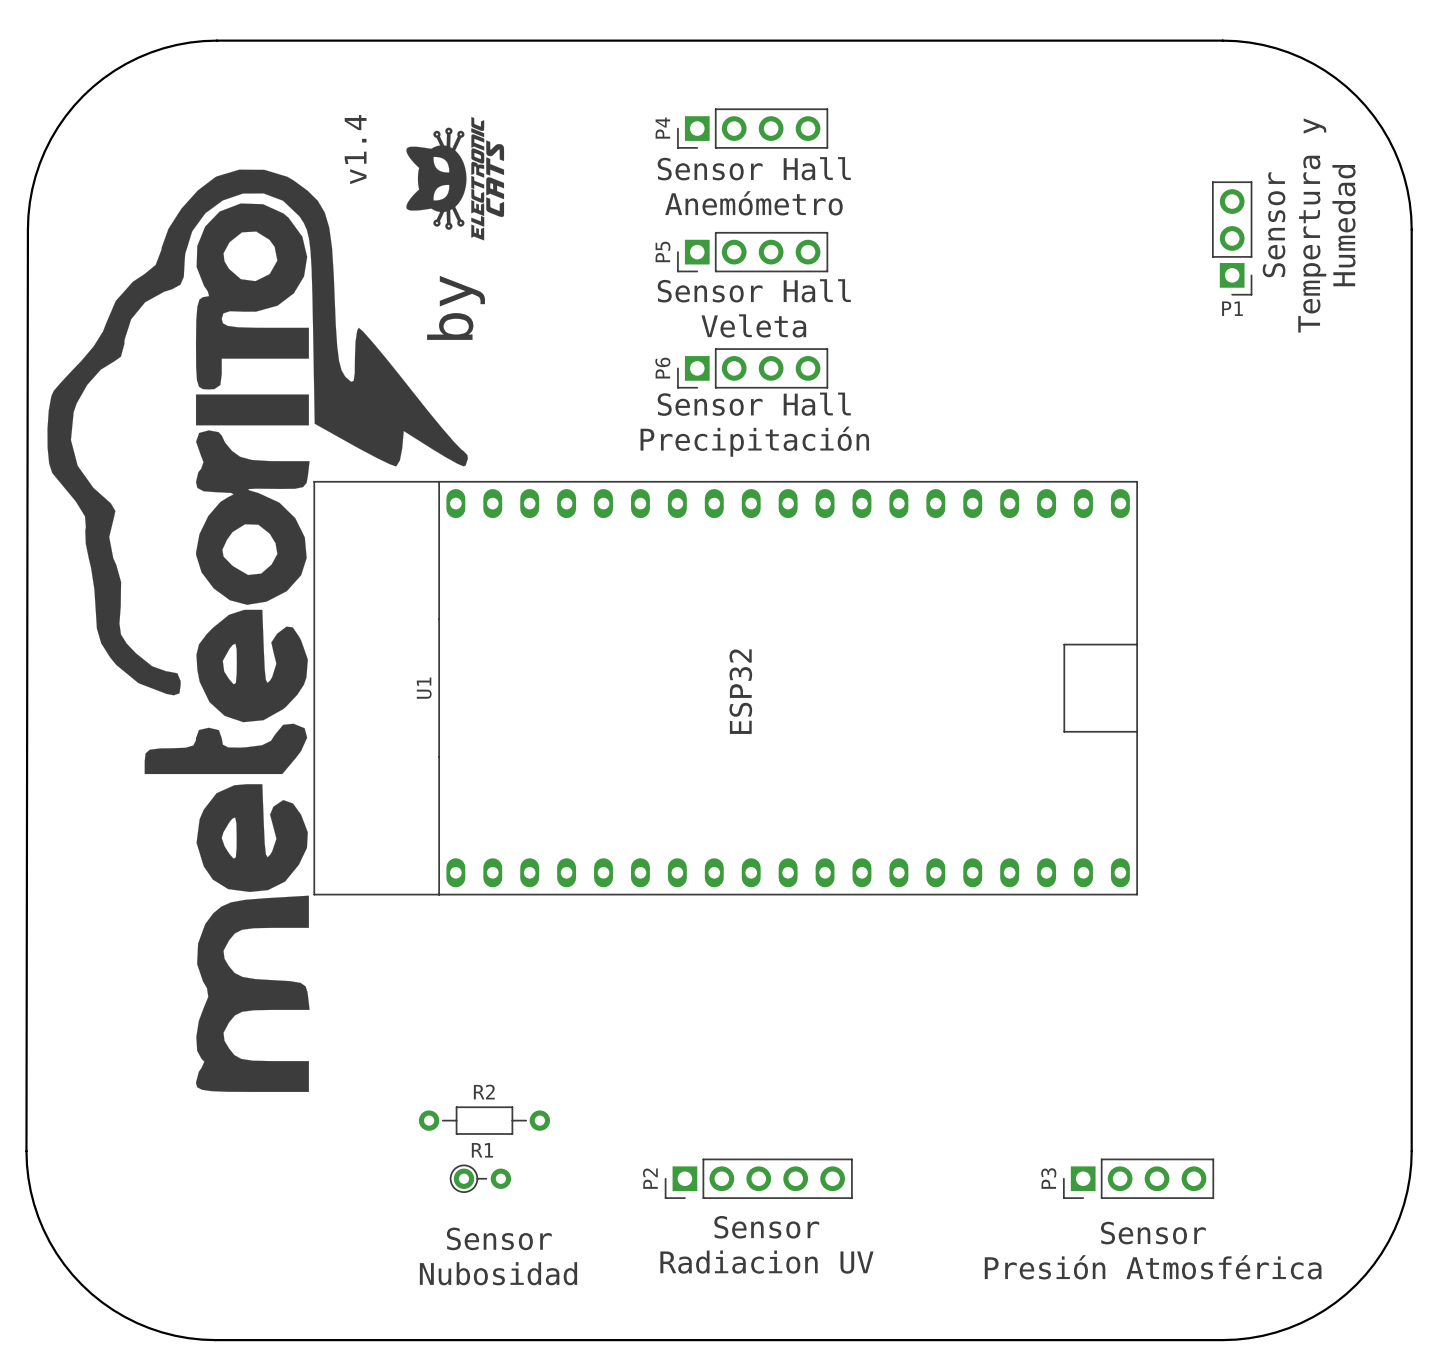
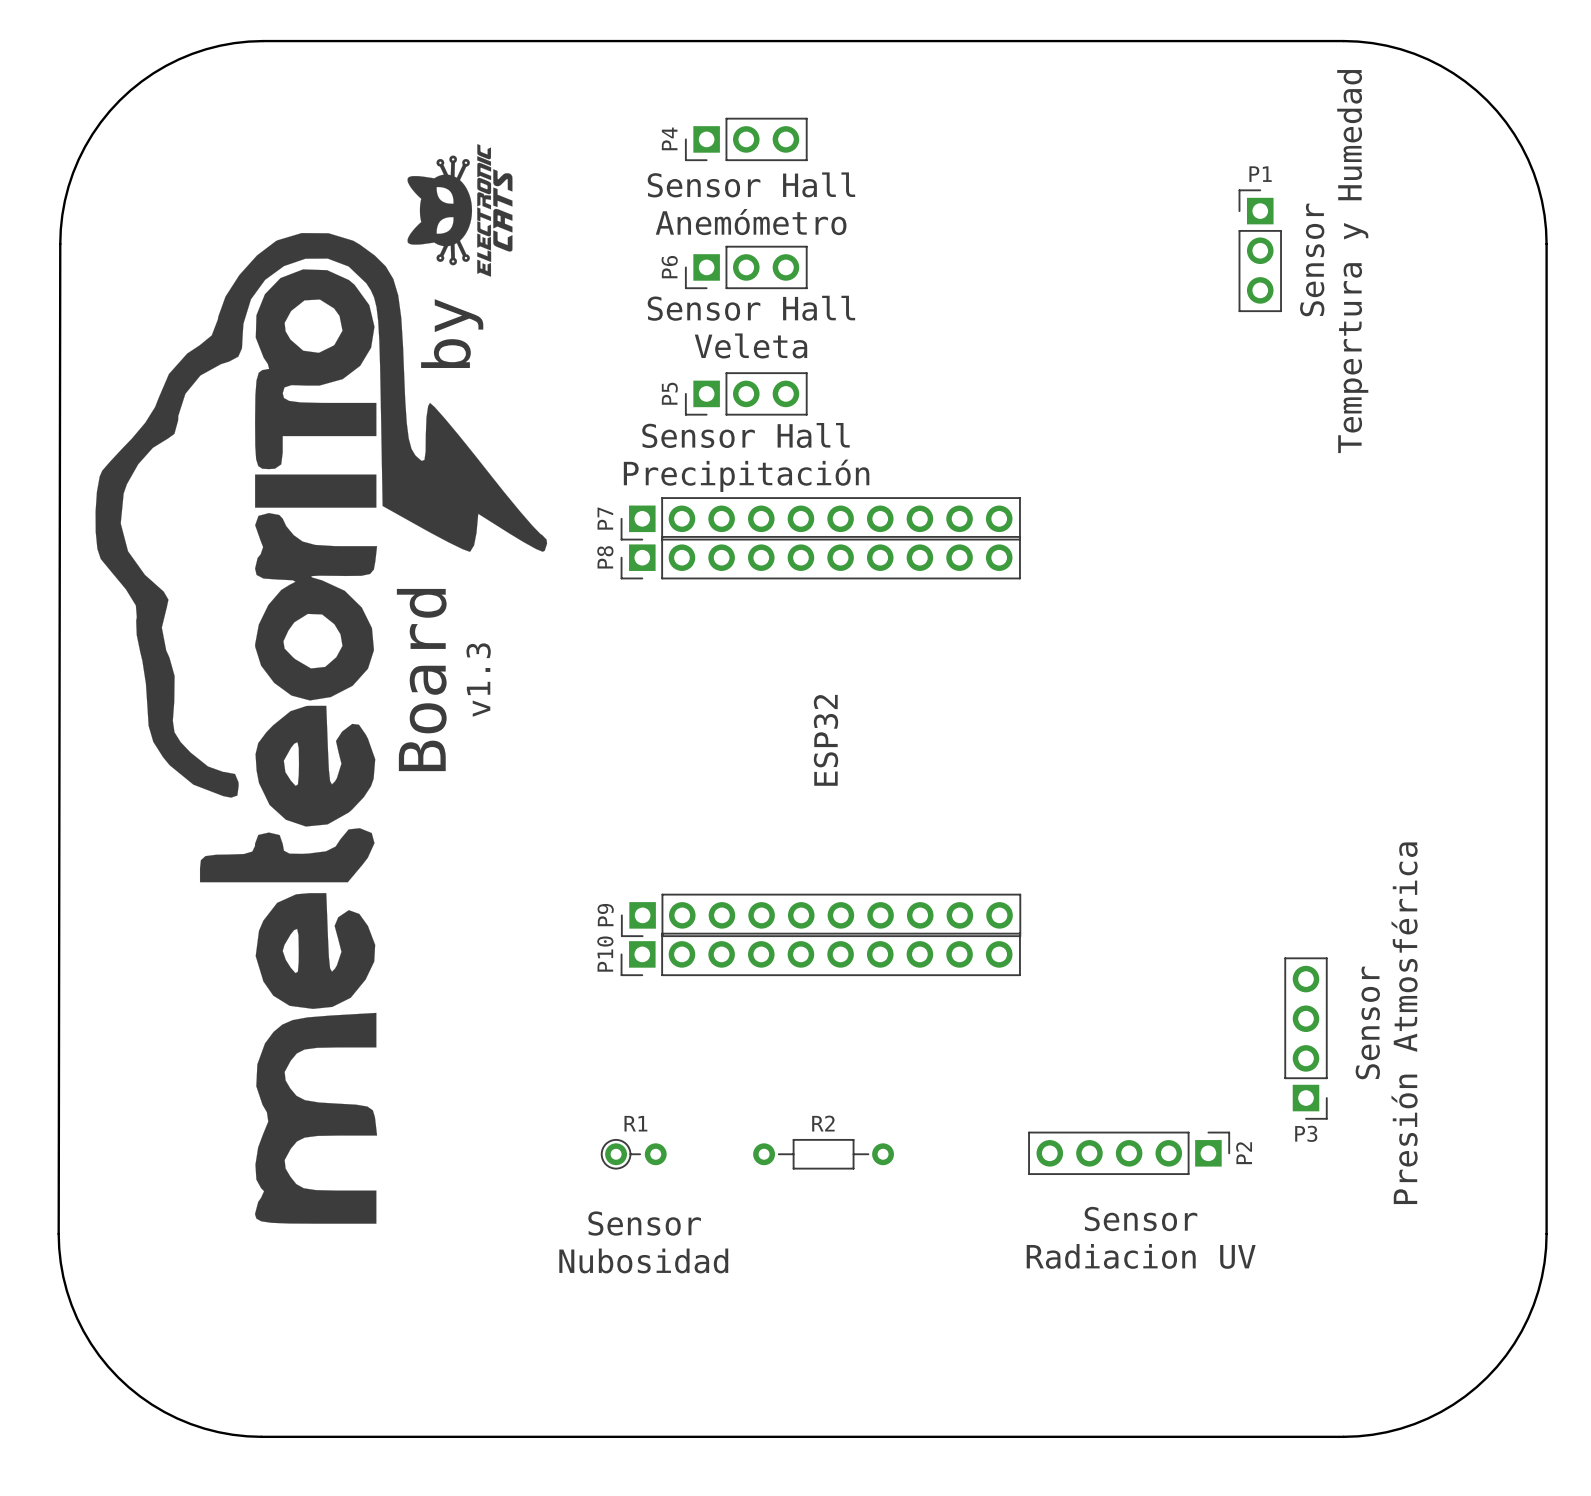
P4 footprint: [677, 108, 829, 149] -> [684, 117, 808, 162]
text: v1.4 (355, 149) -> none
text position: Sensor Hall (754, 168) -> Sensor Hall (751, 184)
drawing position: (455, 178) -> (460, 210)
text position: Anemómetro (753, 203) -> Anemómetro (751, 222)
text position: Sensor (1274, 224) -> Sensor (1312, 259)
text: Tempertura y (1312, 225) -> none
text: Humedad (1343, 225) -> none
P5 footprint: [677, 231, 829, 273] -> [684, 372, 808, 416]
P1 rotation: 0° (1232, 238) -> 180° (1260, 250)
P1 position: (1232, 238) -> (1260, 250)
text: none -> Tempertura y Humedad (1352, 261)
text position: Sensor Hall (754, 290) -> Sensor Hall (751, 308)
text position: by (456, 307) -> by (452, 333)
text position: Veleta (753, 325) -> Veleta (750, 345)
P6 footprint: [677, 348, 829, 389] -> [684, 245, 808, 290]
text position: Sensor Hall (754, 404) -> Sensor Hall (745, 435)
text position: Precipitación (754, 441) -> Precipitación (746, 475)
P7: none -> (820, 518)
P8: none -> (820, 557)
drawing position: (257, 630) -> (321, 728)
text: none -> Board (421, 680)
text: none -> v1.3 (478, 680)
U1: (725, 688) -> none
P9: none -> (821, 915)
P10: none -> (820, 954)
text: none -> Sensor (1367, 1022)
R2 position: (484, 1120) -> (823, 1154)
text: none -> Sensor (1140, 1219)
text: none -> Sensor (644, 1223)
R1 position: (480, 1178) -> (633, 1154)
P2 rotation: 0° (758, 1178) -> 180° (1129, 1153)
P2 position: (758, 1178) -> (1129, 1153)
P3 rotation: 0° (1138, 1178) -> 90° counterclockwise (1306, 1038)
P3 position: (1138, 1178) -> (1306, 1038)
text: Sensor (766, 1227) -> none
text: Sensor (1153, 1233) -> none
text: Sensor (499, 1238) -> none
text position: Radiacion UV (766, 1262) -> Radiacion UV (1141, 1256)
text rotation: 0° (1153, 1267) -> 90° counterclockwise (1404, 1023)
text position: Nubosidad (498, 1273) -> Nubosidad (643, 1260)

